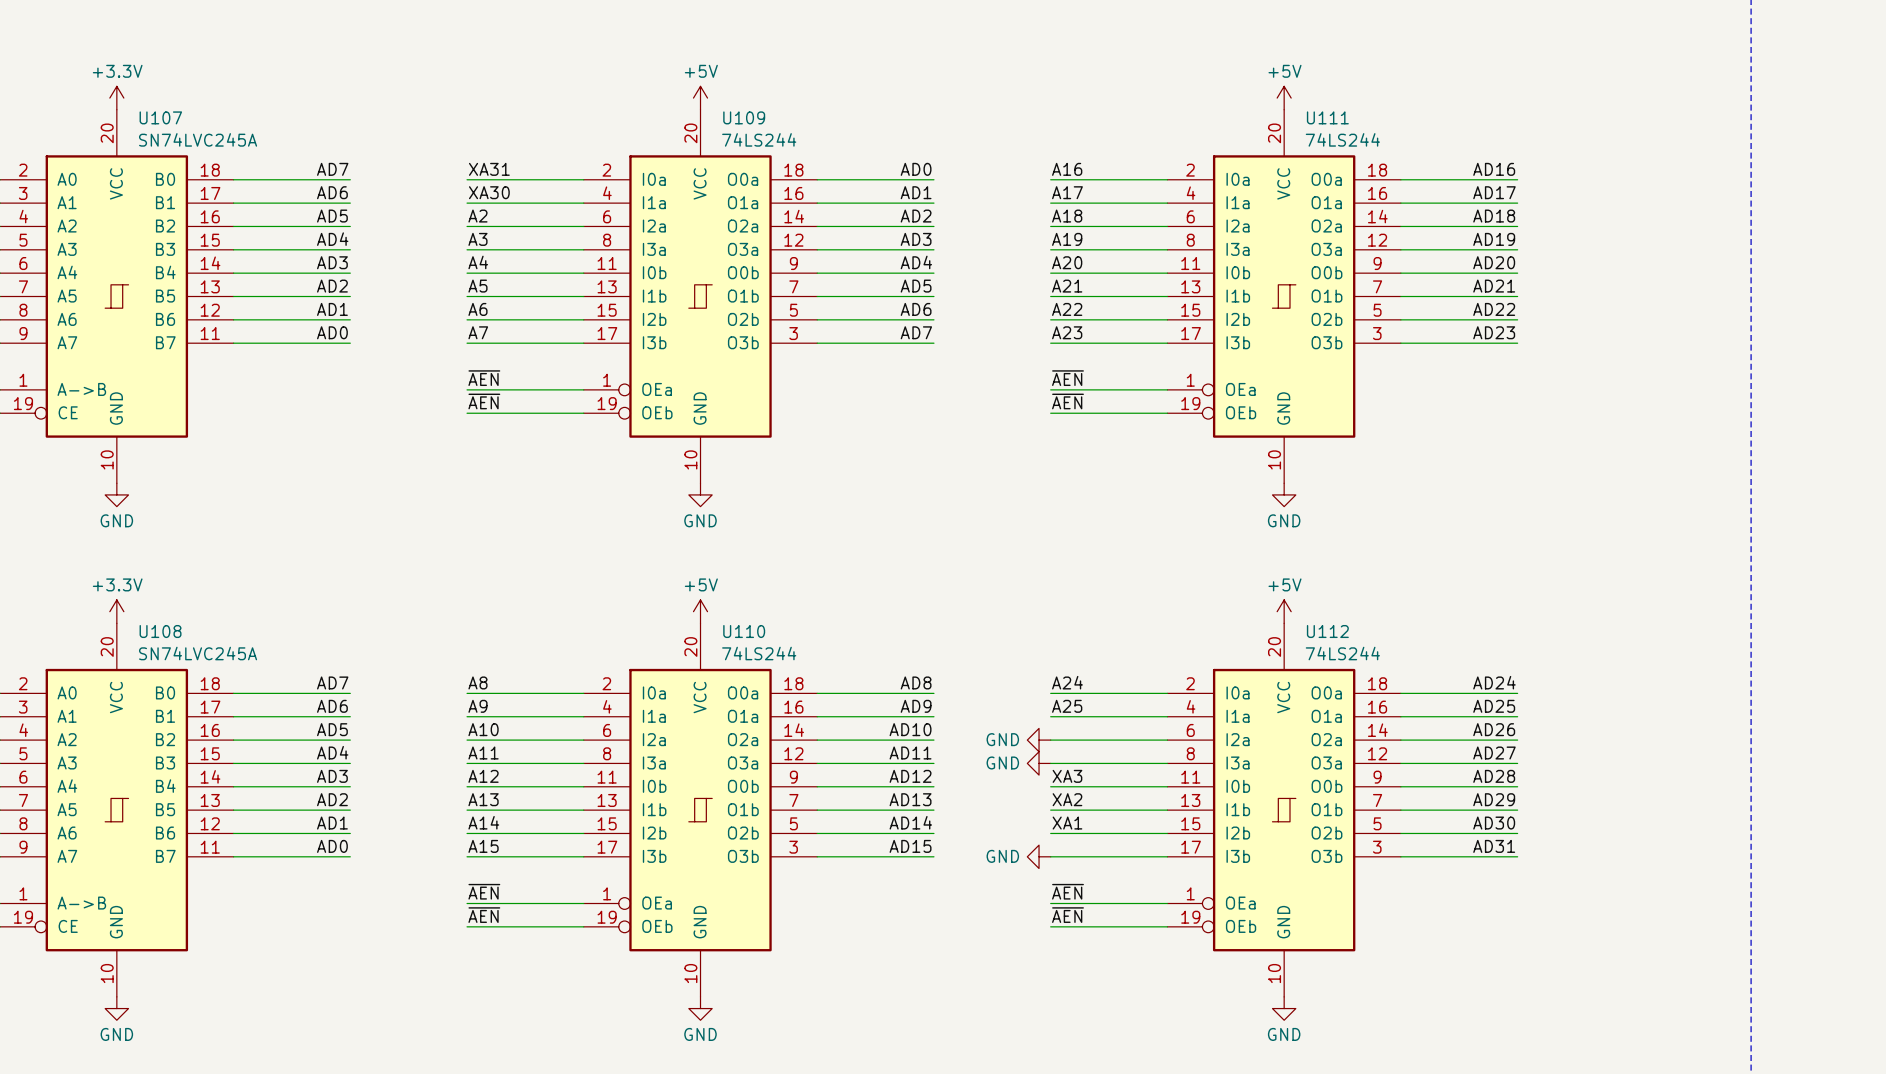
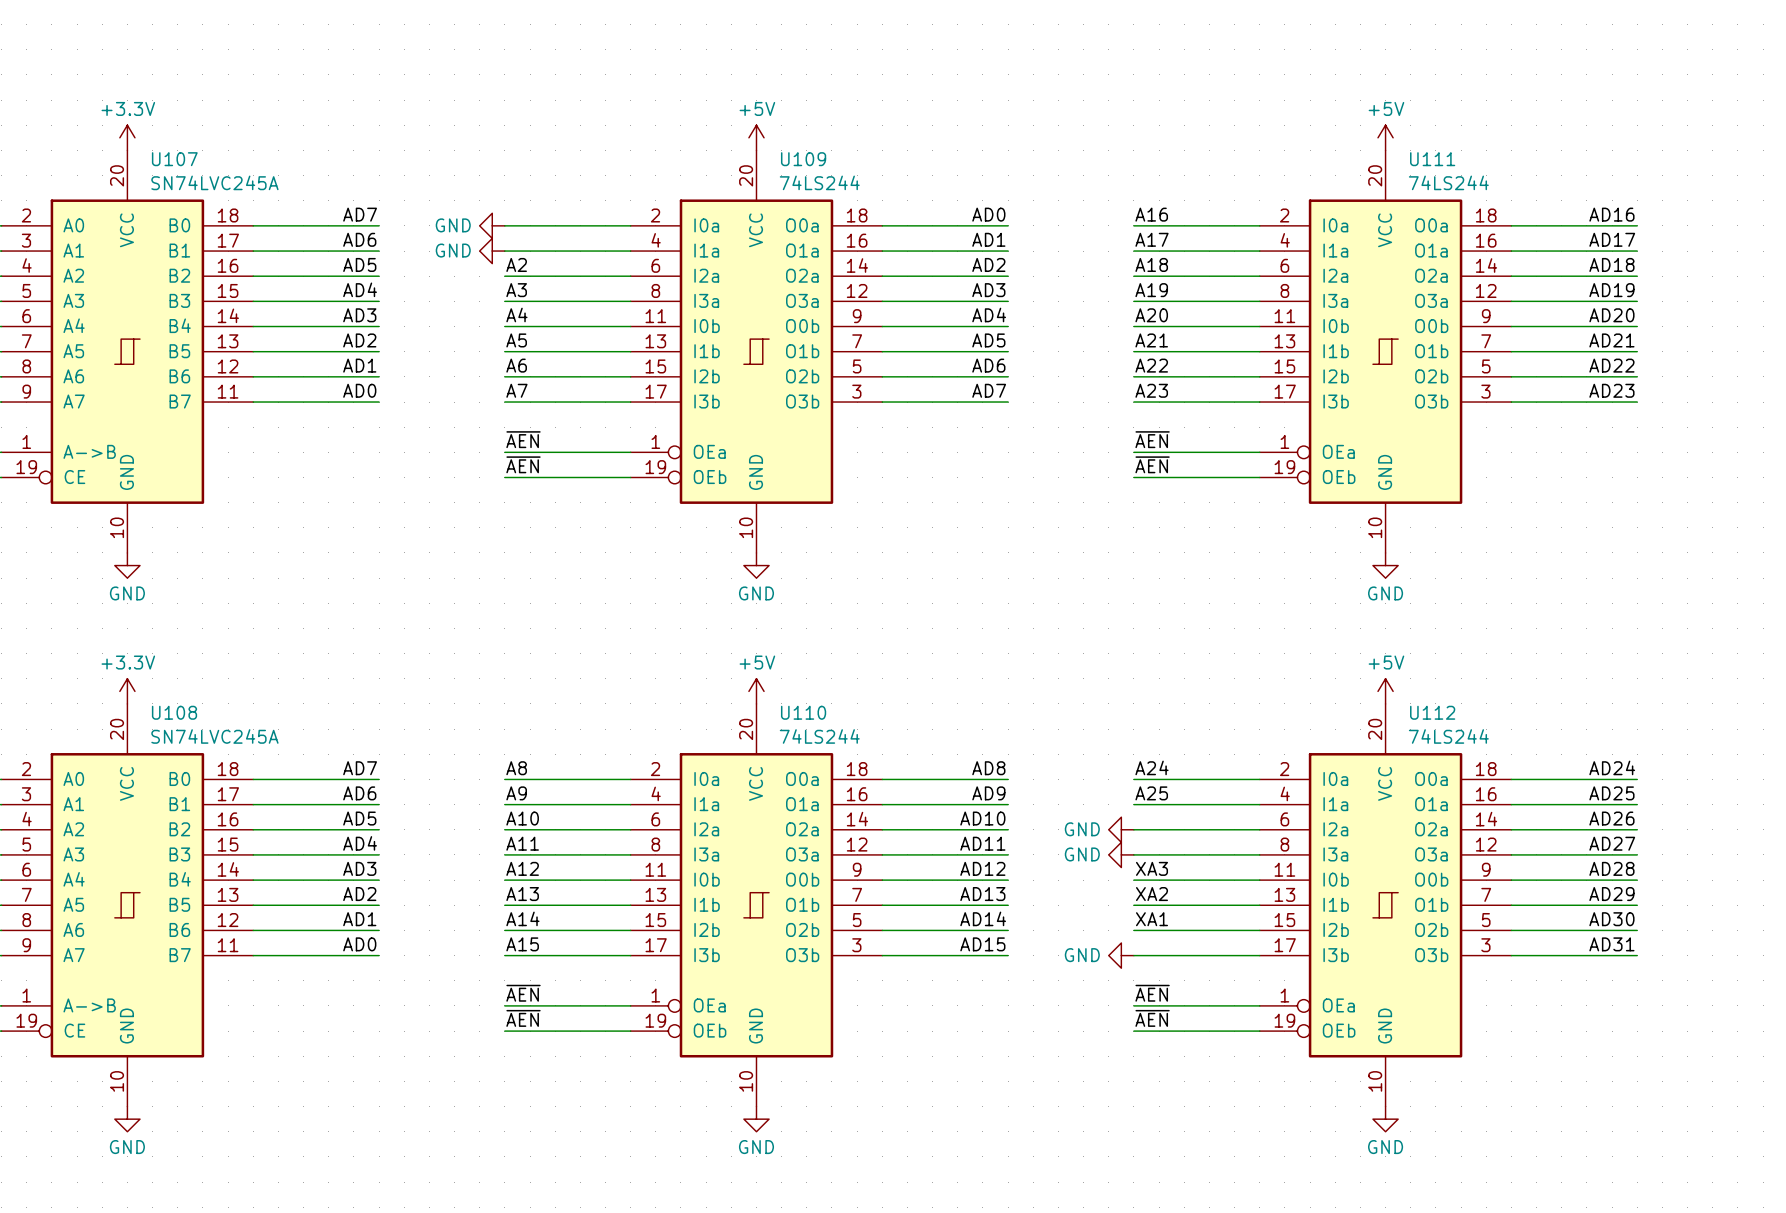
label: XA31 (489, 169) -> none
power symbol: none -> GND (492, 225)
label: XA30 (489, 192) -> none
power symbol: none -> GND (492, 251)

